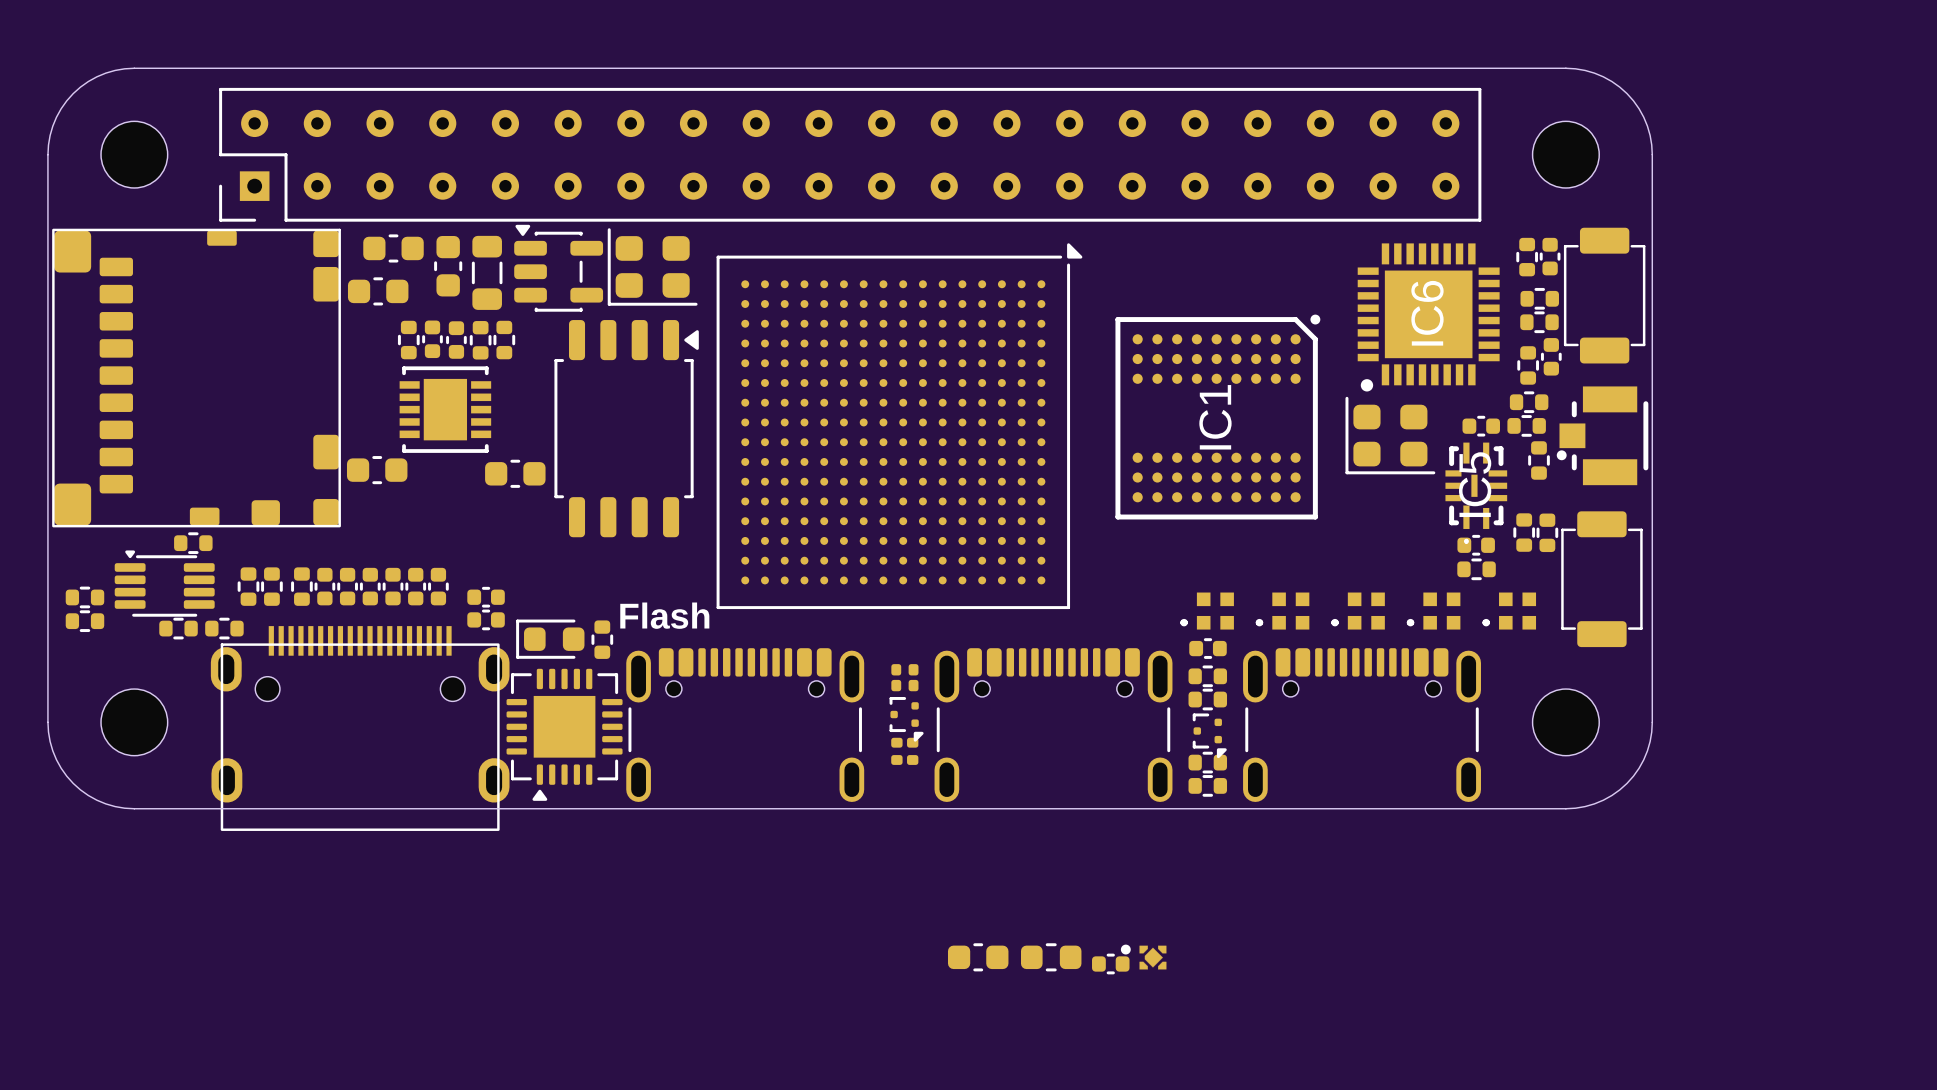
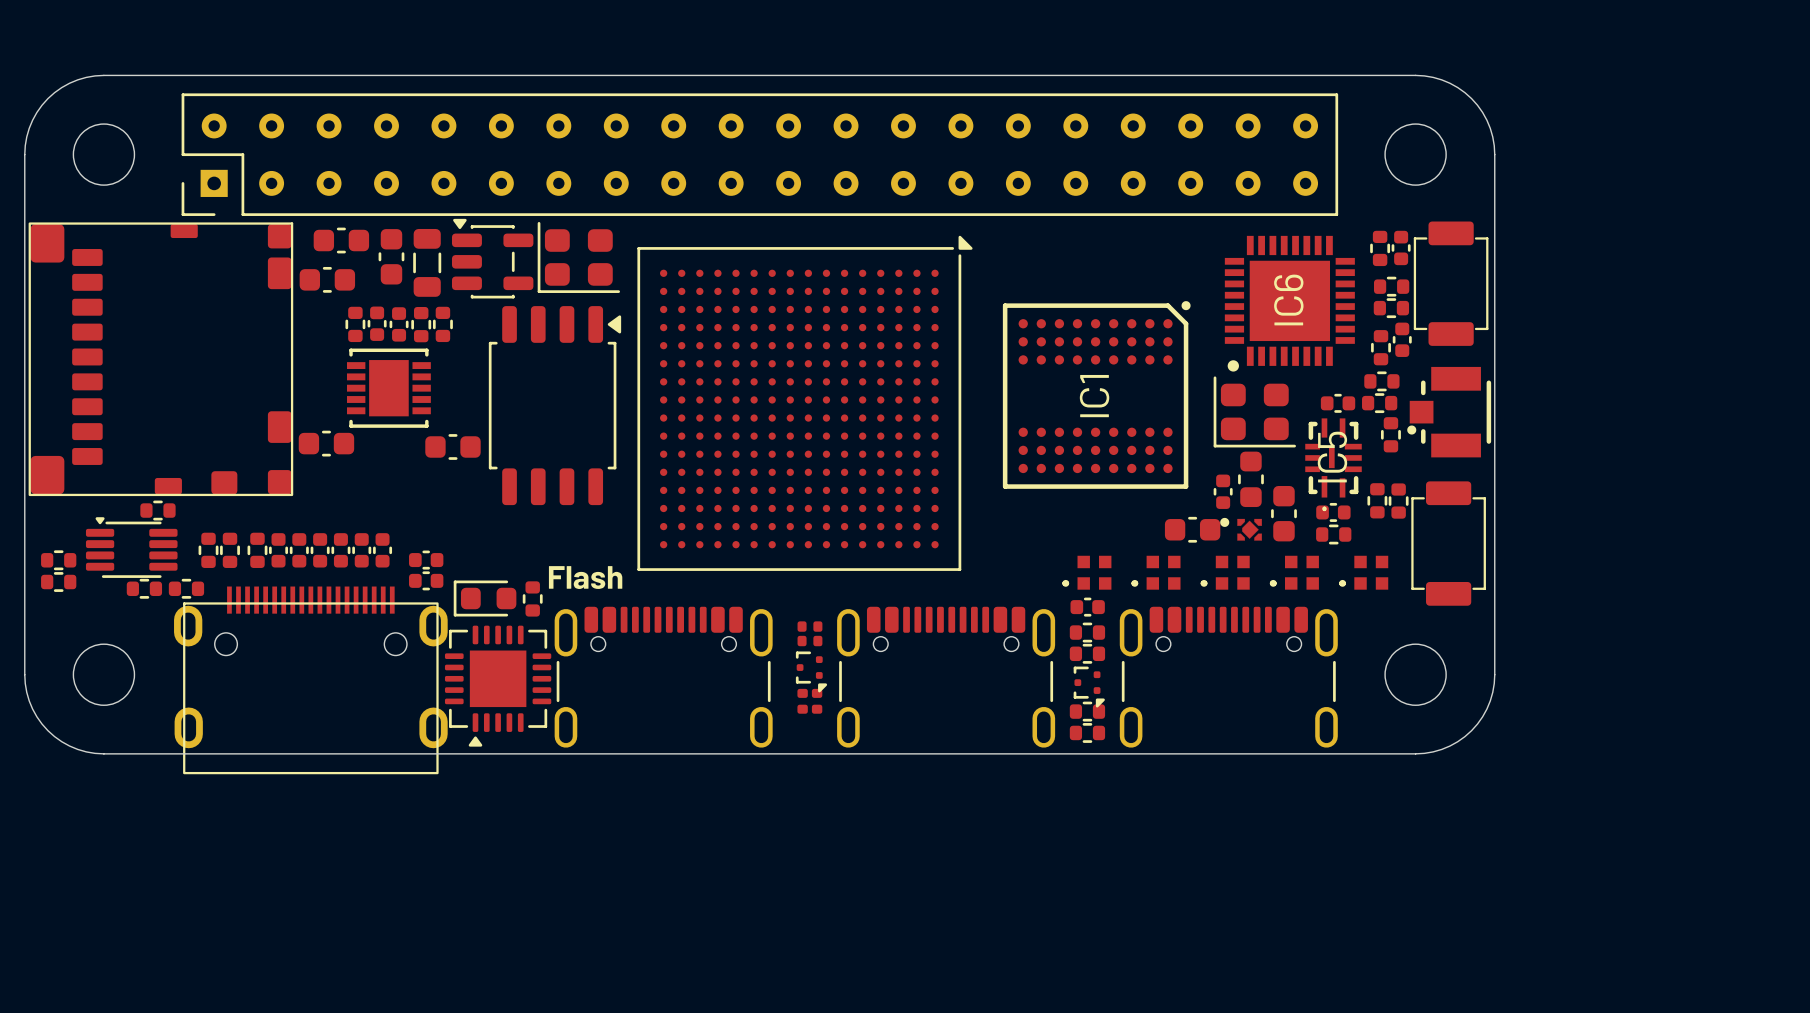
part: none -> (1283, 513)
part: none -> (1192, 529)
part: (978, 957) -> none
part rotation: 0° (1051, 957) -> 90° clockwise (1250, 479)
part position: (1051, 957) -> (1250, 479)
part position: (1143, 957) -> (1241, 529)
part rotation: 0° (1110, 963) -> 90° clockwise (1223, 491)
part position: (1110, 963) -> (1223, 491)

